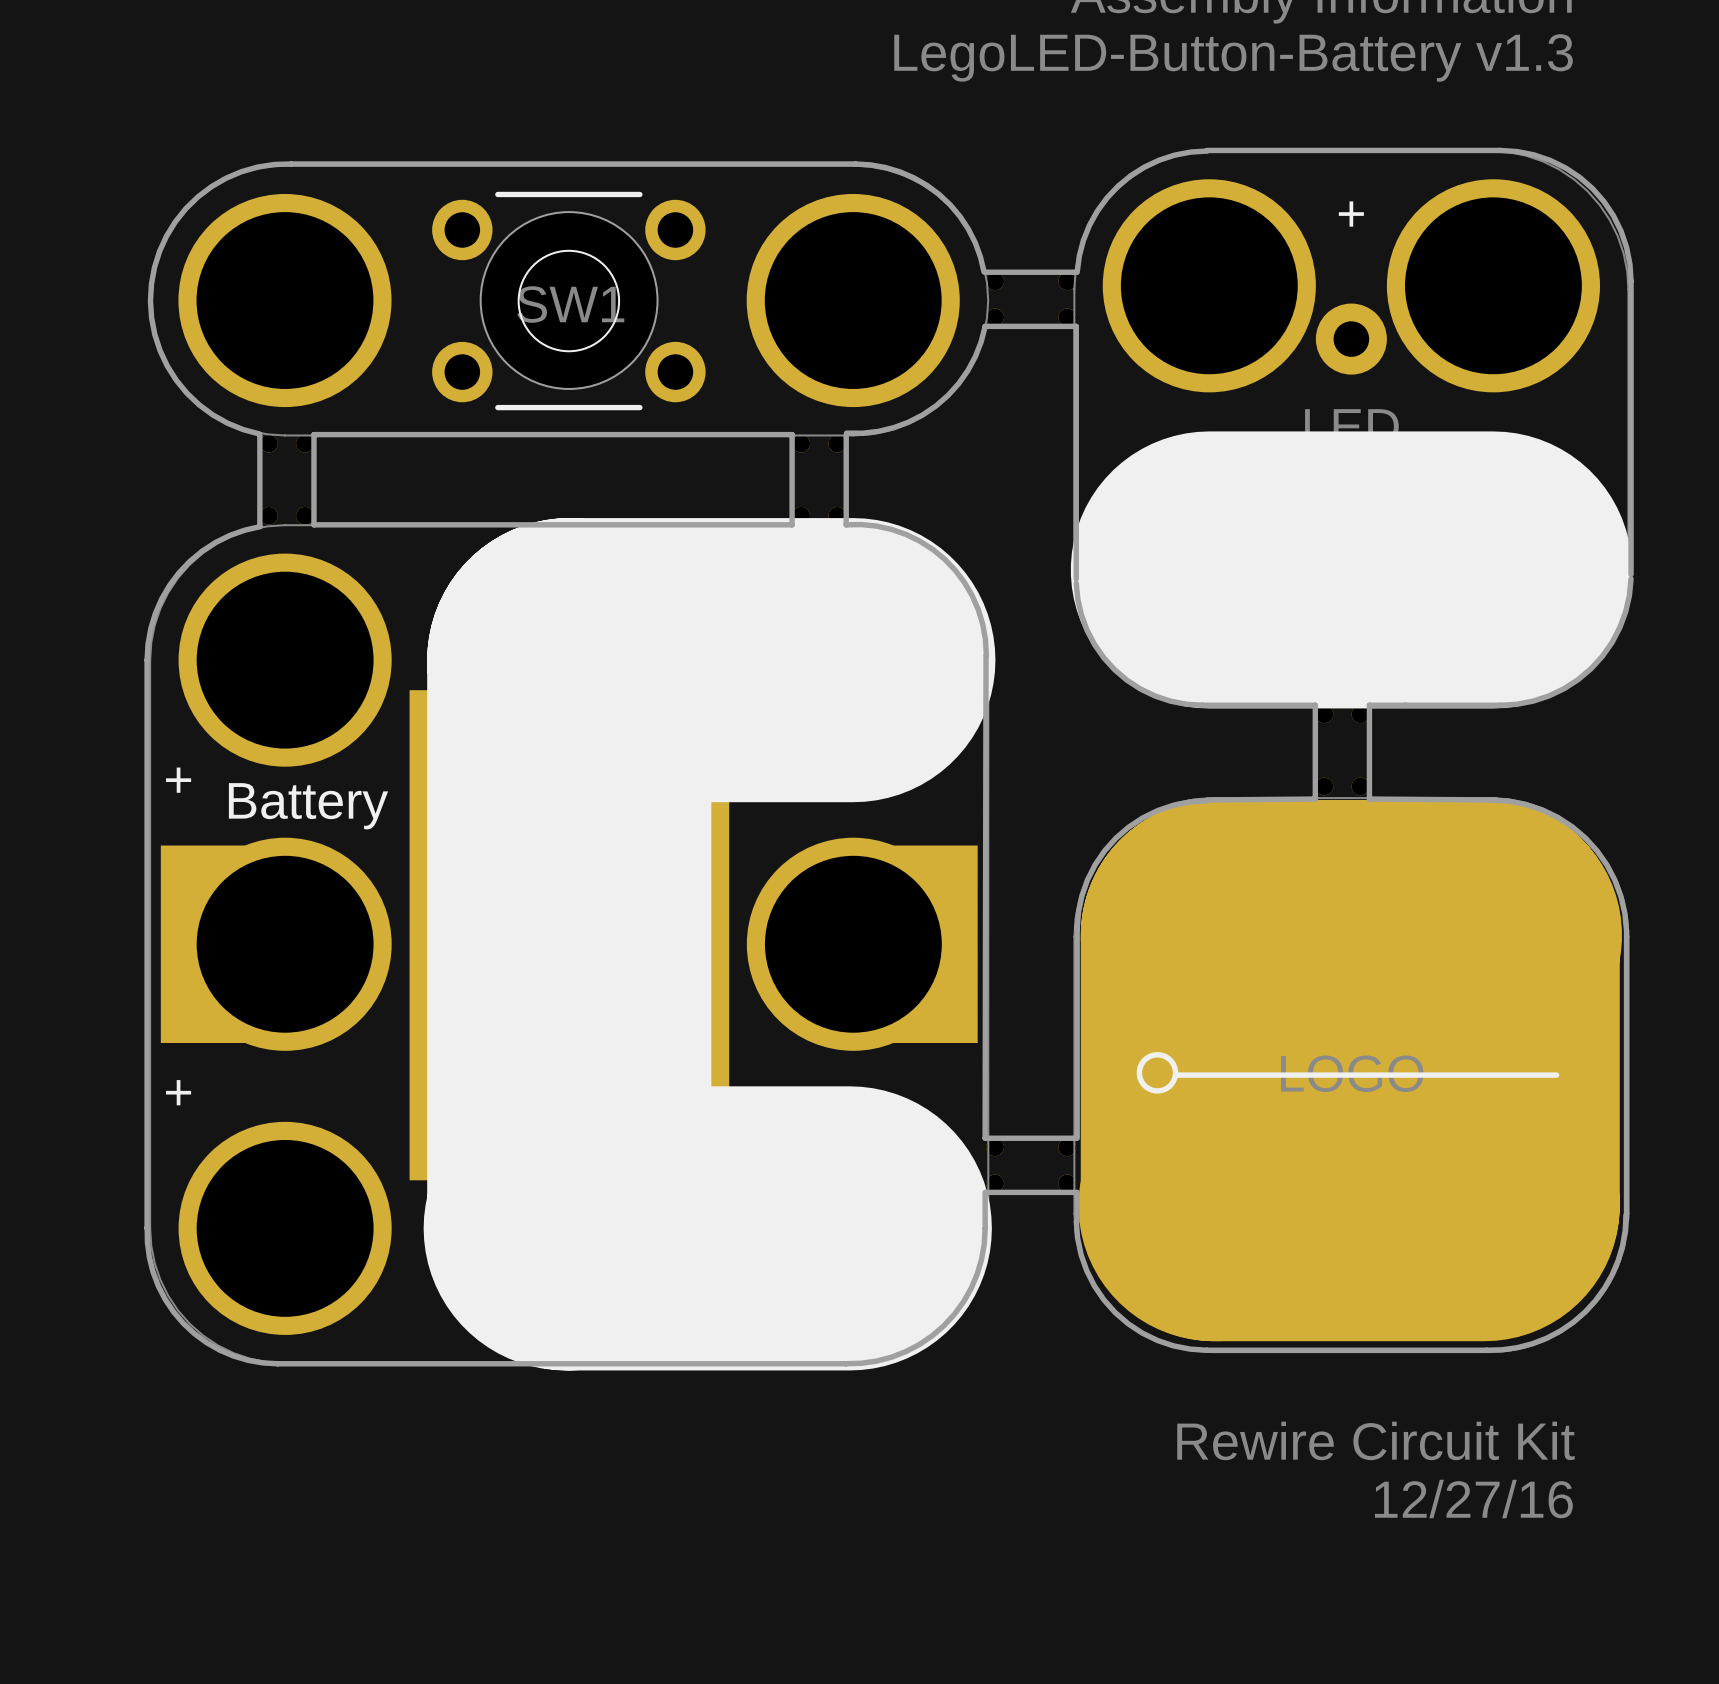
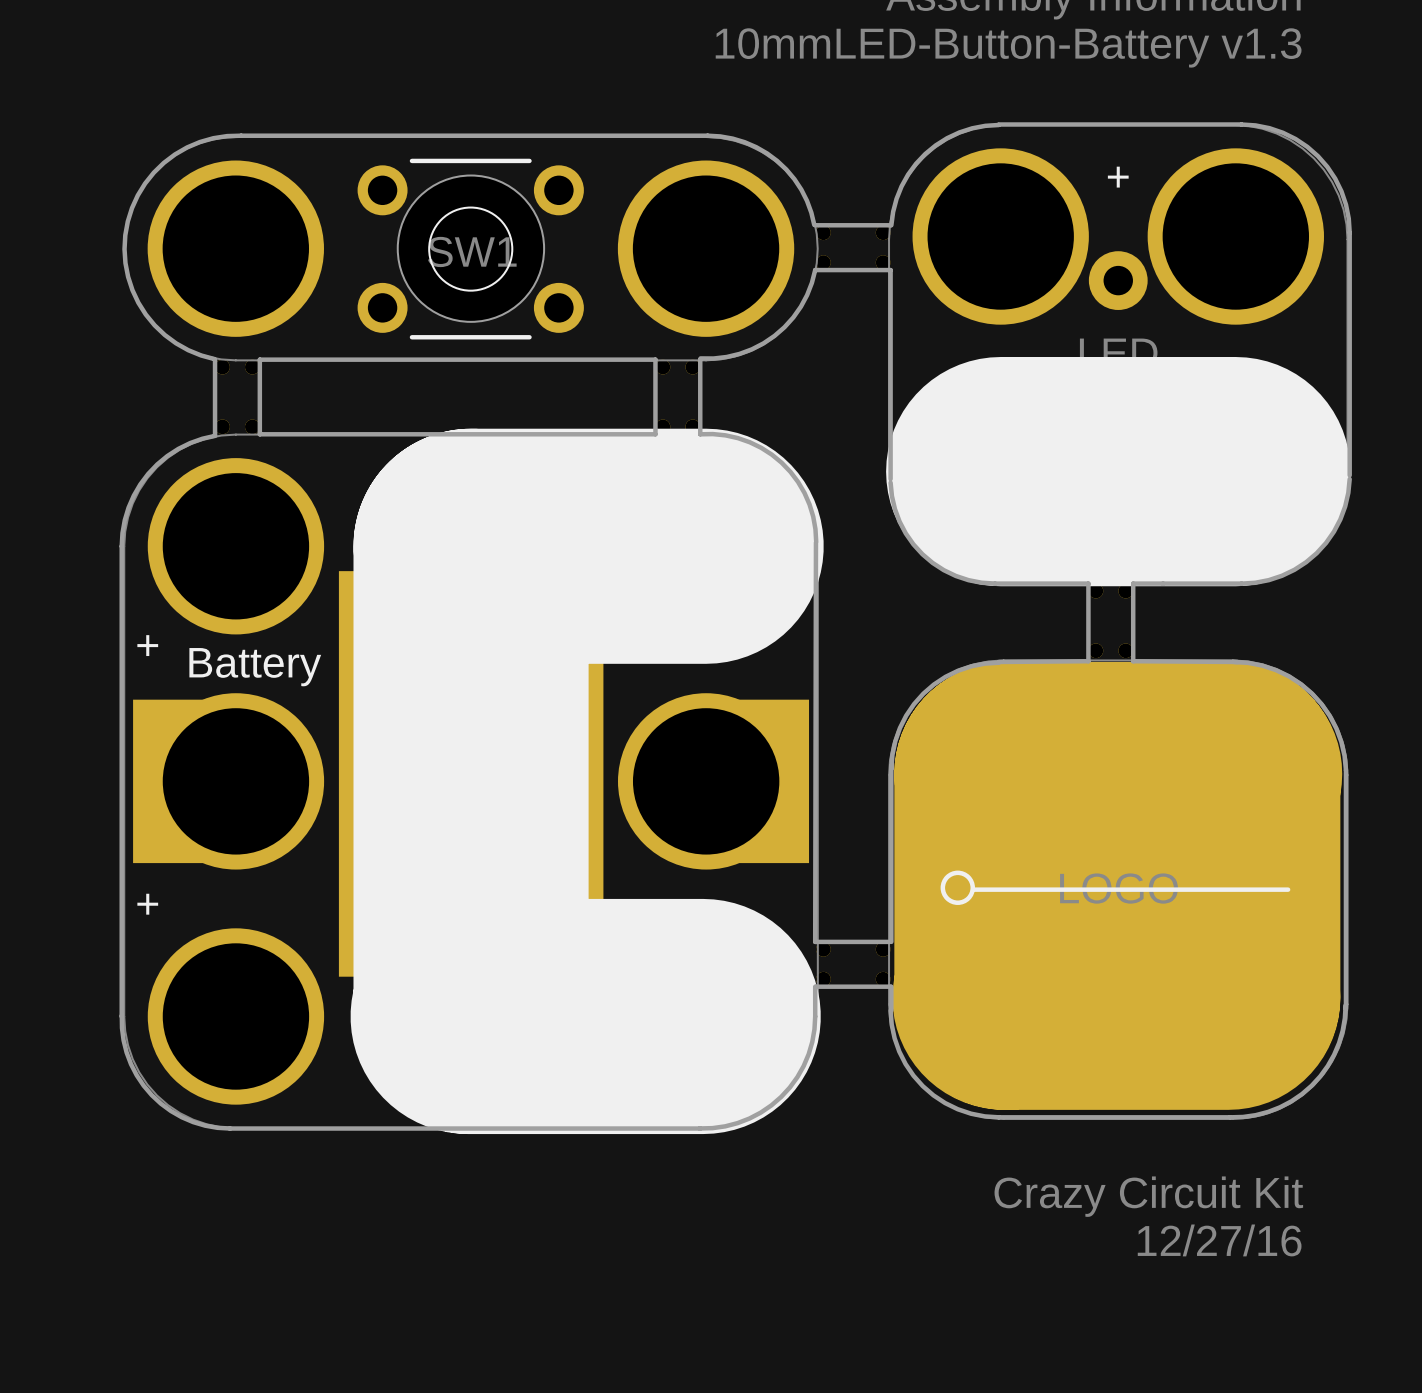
text: LegoLED-Button-Battery v1.3 (1233, 57) -> 10mmLED-Button-Battery v1.3 (1008, 47)
text: Rewire Circuit Kit (1375, 1440) -> Crazy Circuit Kit (1148, 1196)

